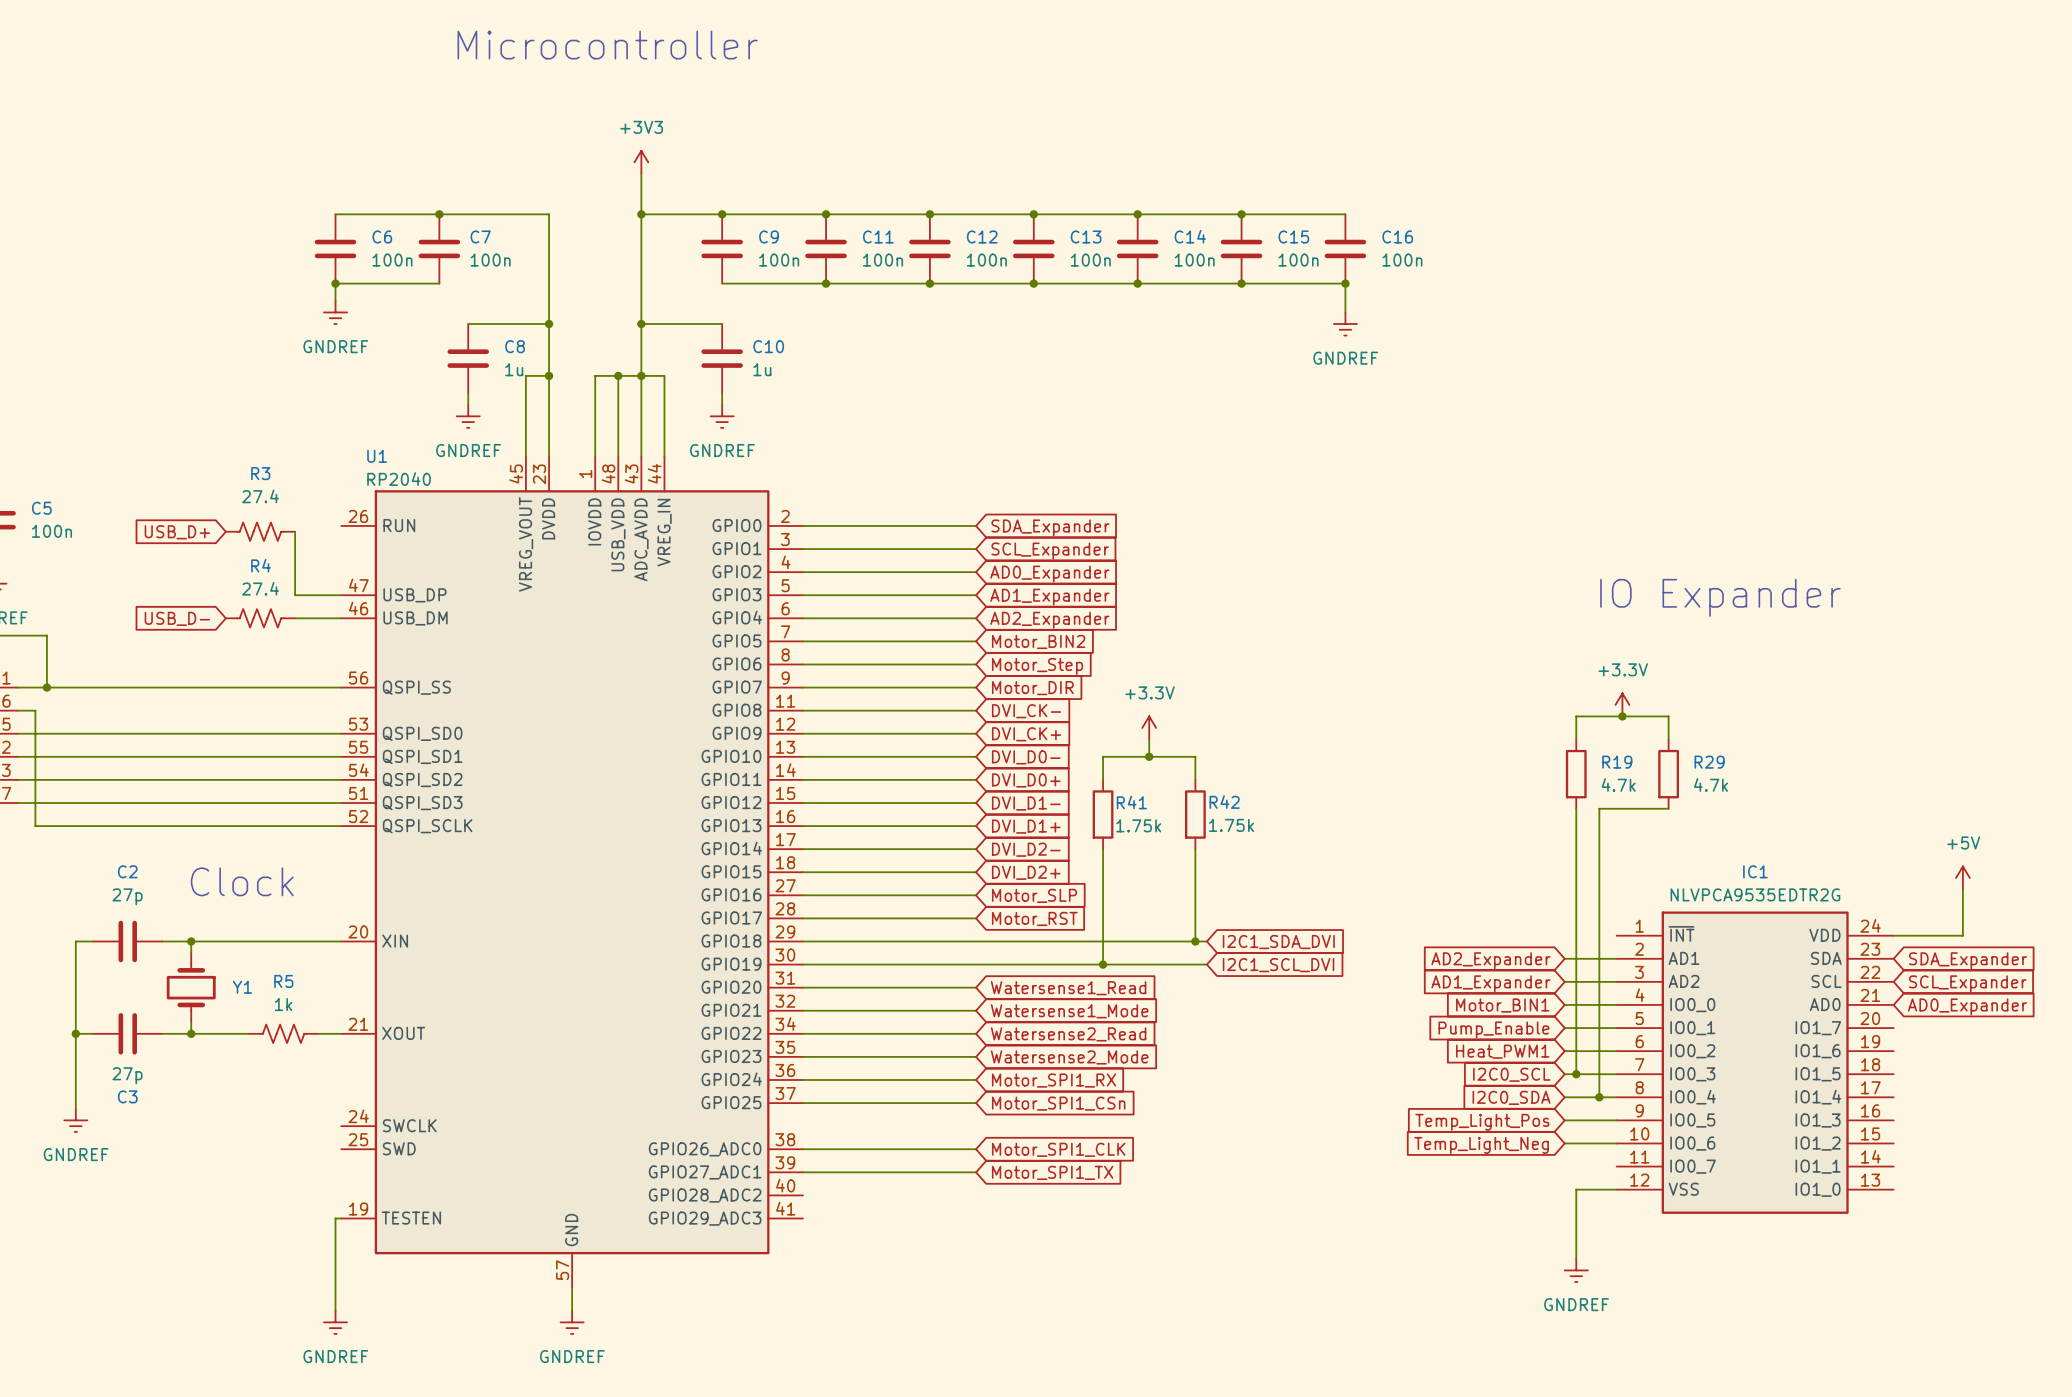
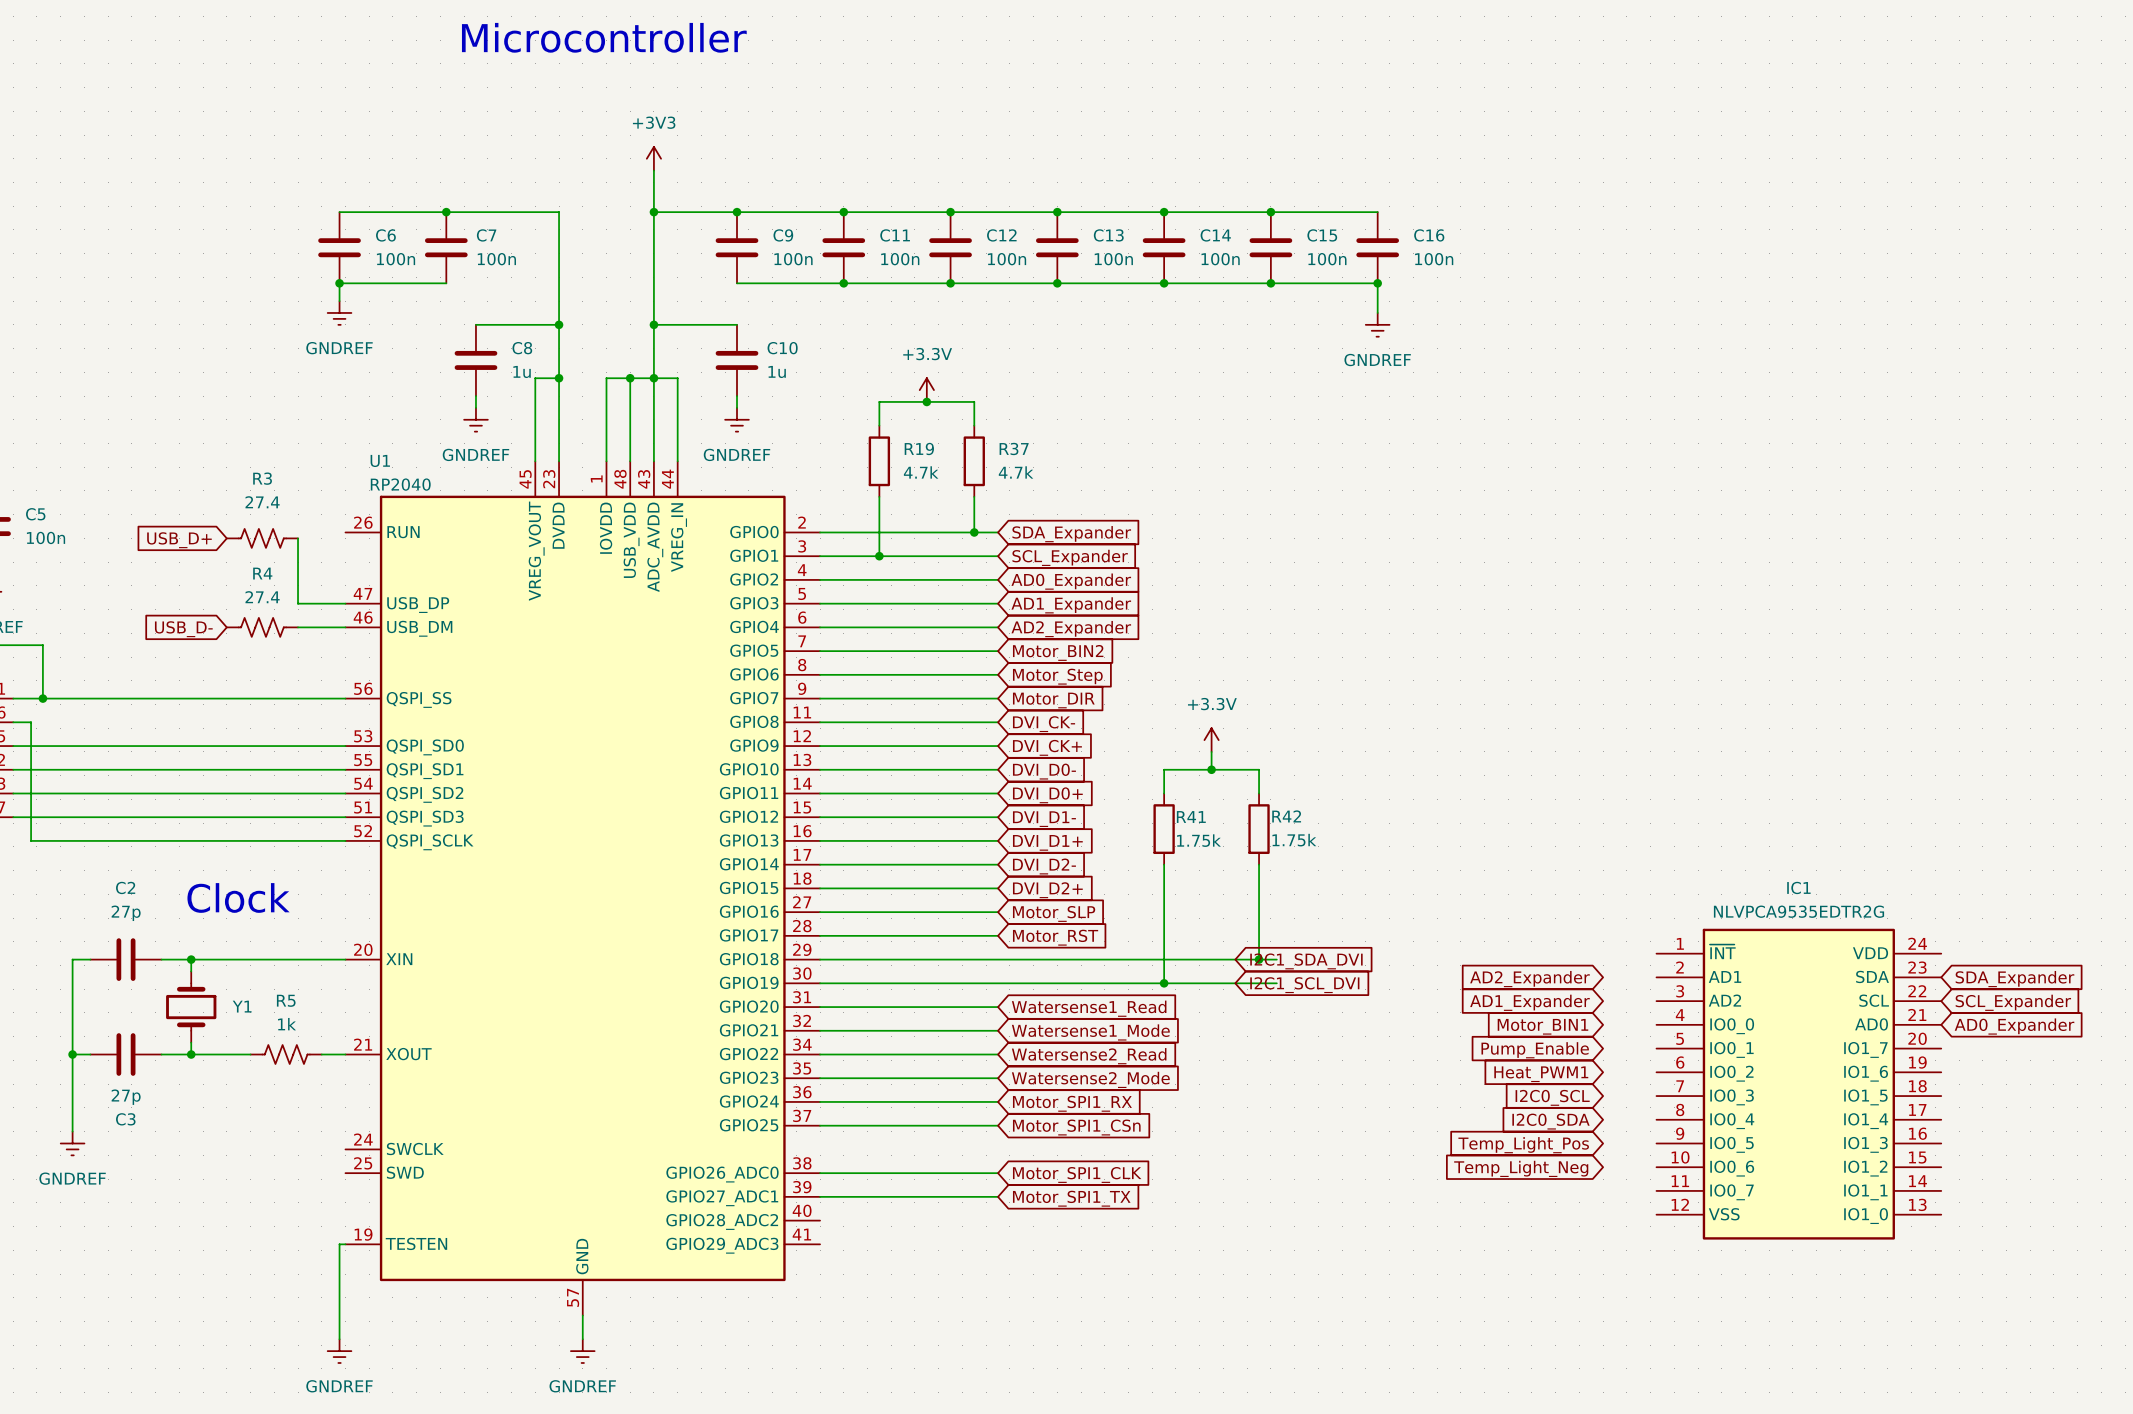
power symbol: none -> +3.3V (926, 390)
junction: none -> (926, 401)
wire: none -> (879, 425) (879, 401) (974, 401) (974, 425)
R37: none -> 4.7k (974, 461)
wire: none -> (879, 496) (879, 556)
wire: none -> (974, 496) (974, 532)
junction: none -> (974, 532)
junction: none -> (879, 556)
text: IO Expander (1720, 597) -> none
power symbol: +3.3V (1622, 704) -> none
junction: (1622, 716) -> none
power symbol position: +3.3V (1149, 727) -> +3.3V (1211, 740)
wire: (1149, 739) (1149, 756) -> (1211, 751) (1211, 769)
wire: (1576, 739) (1576, 716) (1668, 716) (1668, 739) -> none
wire: (1137, 756) (1103, 756) (1103, 779) -> (1164, 769) (1164, 793)
junction position: (1149, 756) -> (1211, 769)
wire: (1195, 756) (1195, 779) -> (1223, 769) (1259, 769) (1259, 793)
R19 position: (1576, 774) -> (879, 461)
R29: 4.7k (1668, 774) -> none
wire: (1576, 808) (1576, 1074) -> none
wire: (1668, 808) (1599, 808) (1599, 1097) -> none
R41 position: (1103, 814) -> (1164, 829)
R42 position: (1195, 814) -> (1259, 829)
wire: (1103, 849) (1103, 964) -> (1164, 864) (1164, 983)
wire: (1195, 849) (1195, 941) -> (1259, 864) (1259, 959)
power symbol: +5V (1962, 878) -> none
wire: (1962, 889) (1962, 935) (1893, 935) -> none
junction: (1195, 941) -> none
wire: none -> (1235, 959) (1276, 959)
junction: none -> (1259, 959)
wire: (1564, 958) (1616, 958) -> none
junction: (1103, 964) -> none
junction: none -> (1164, 983)
wire: none -> (1235, 983) (1276, 983)
wire: (1564, 981) (1616, 981) -> none
wire: (1564, 1004) (1616, 1004) -> none
wire: (1564, 1028) (1616, 1028) -> none
wire: (1564, 1051) (1616, 1051) -> none
wire: (1564, 1074) (1616, 1074) -> none
junction: (1576, 1074) -> none
wire: (1564, 1097) (1616, 1097) -> none
junction: (1599, 1097) -> none
wire: (1564, 1120) (1616, 1120) -> none
wire: (1564, 1143) (1616, 1143) -> none
wire: (1616, 1189) (1576, 1189) (1576, 1258) -> none
power symbol: GNDREF (1576, 1270) -> none

